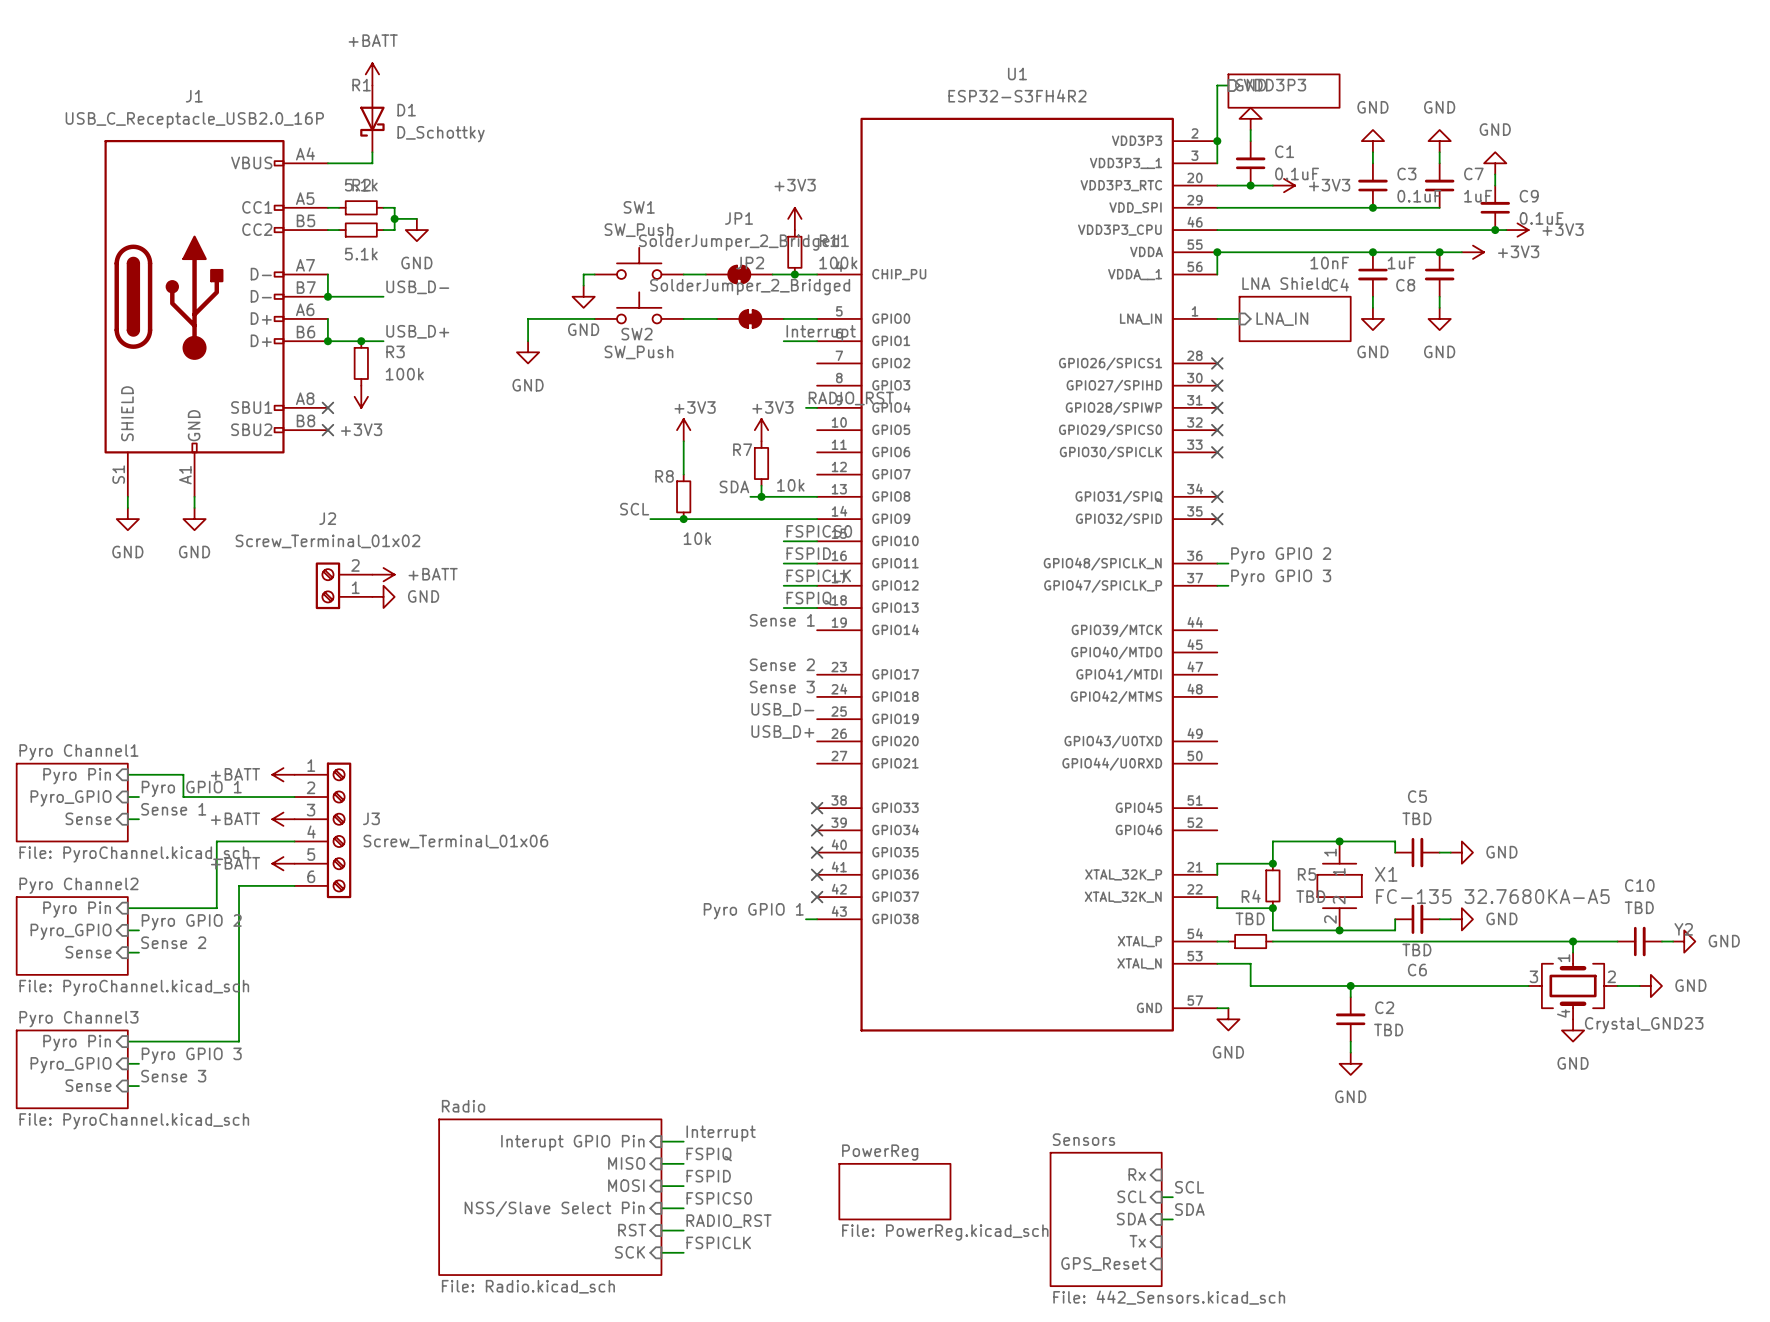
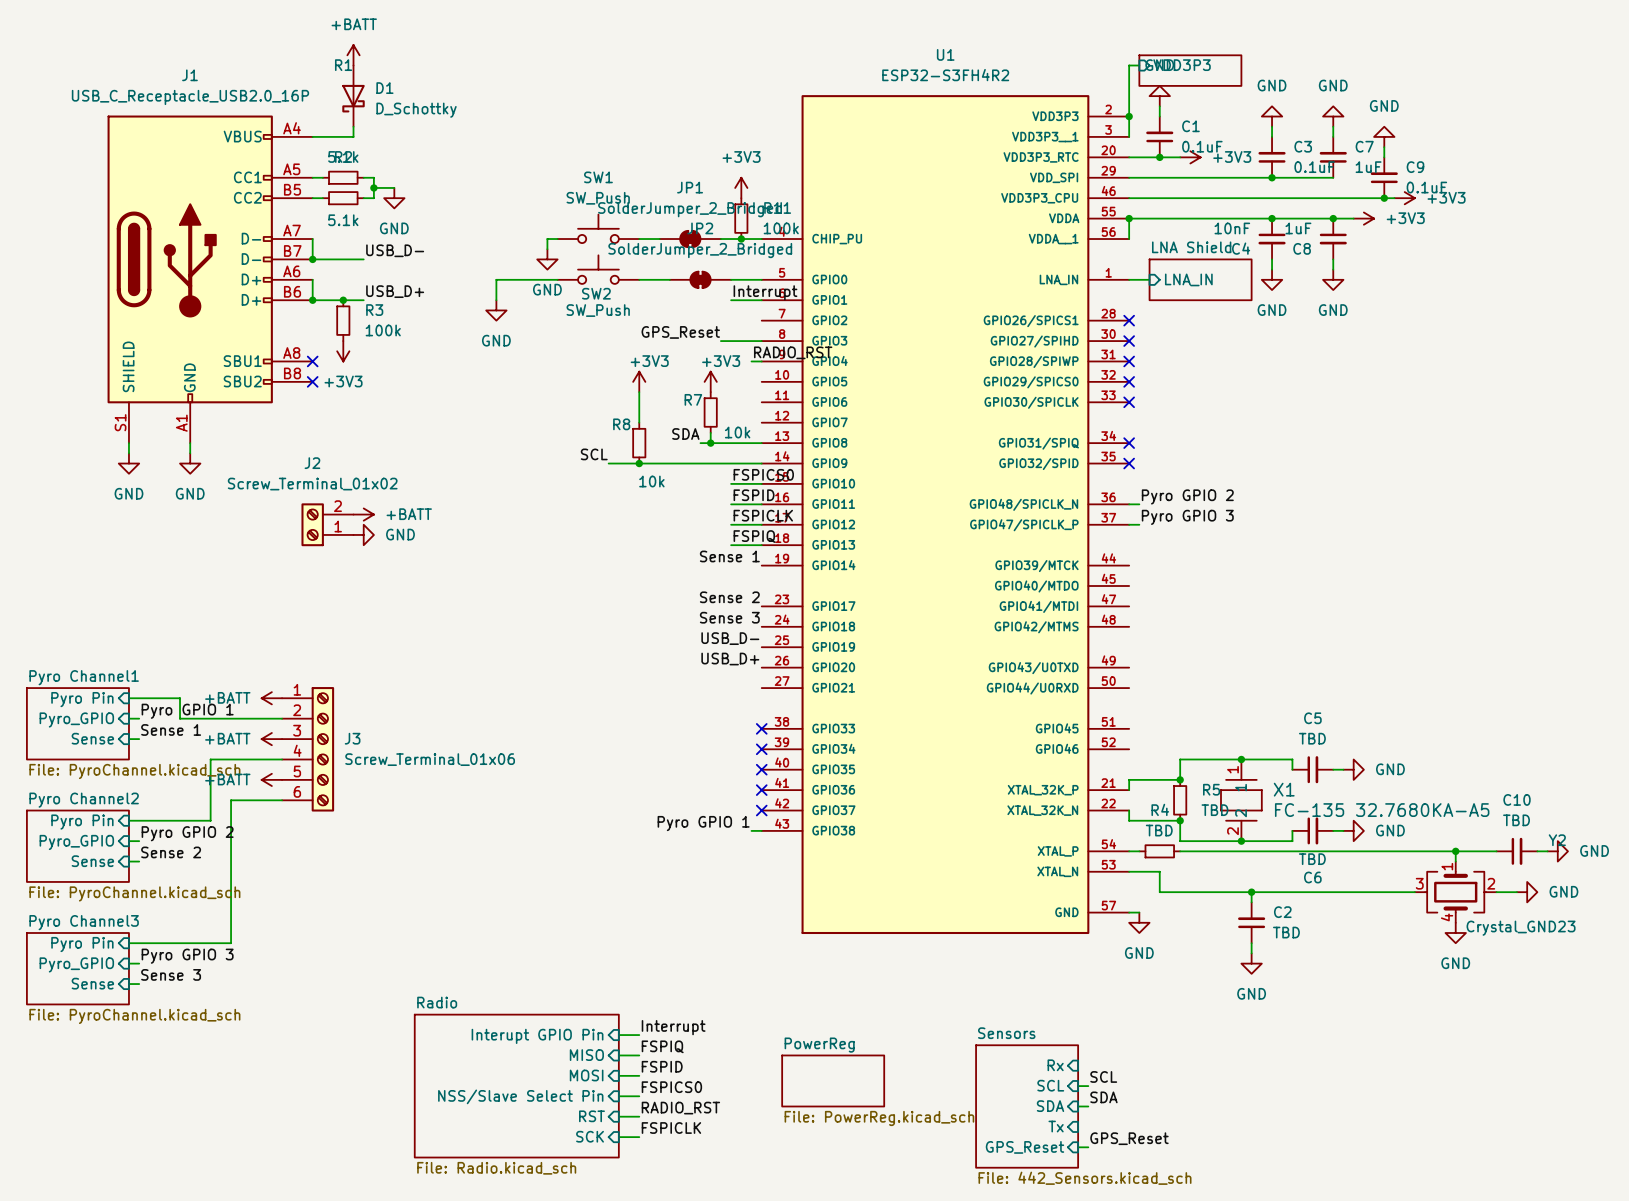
label: none -> GPS_Reset (680, 332)
wire: none -> (720, 341) (761, 341)
label: none -> GPS_Reset (1129, 1138)
wire: none -> (1078, 1147) (1088, 1147)

